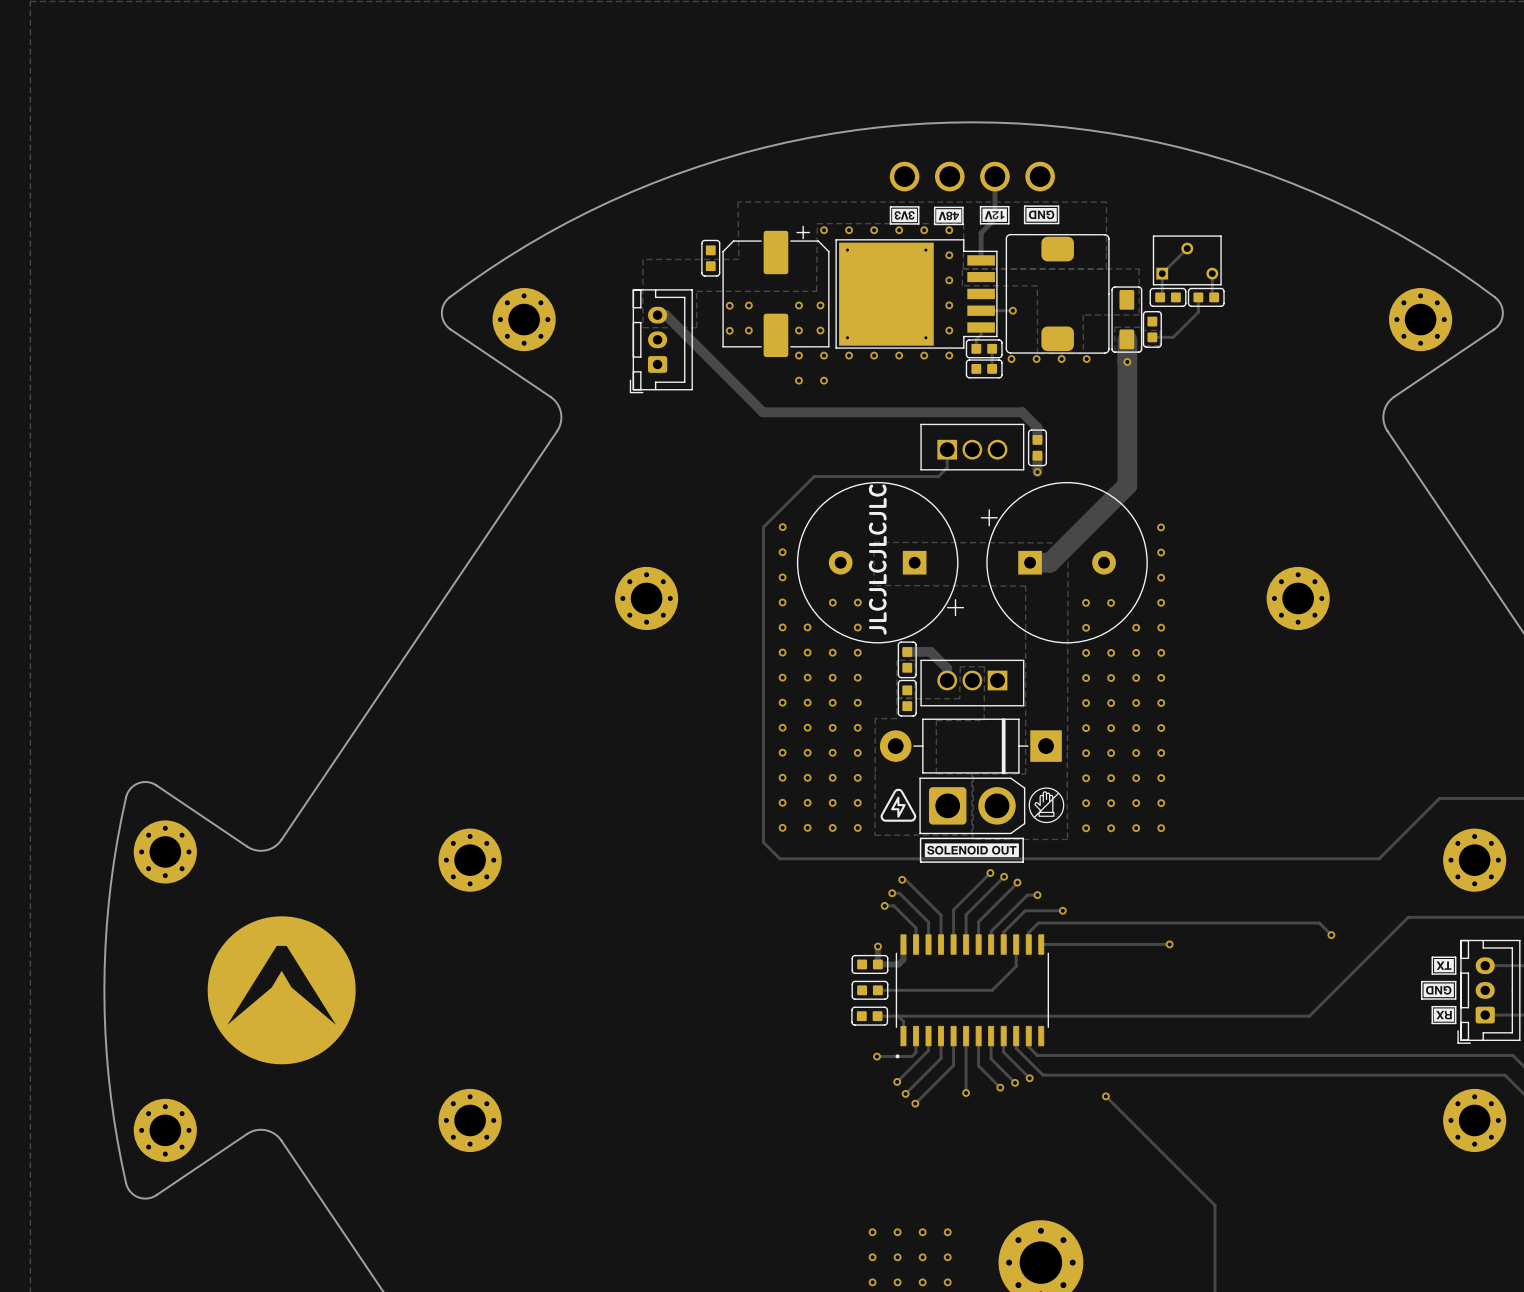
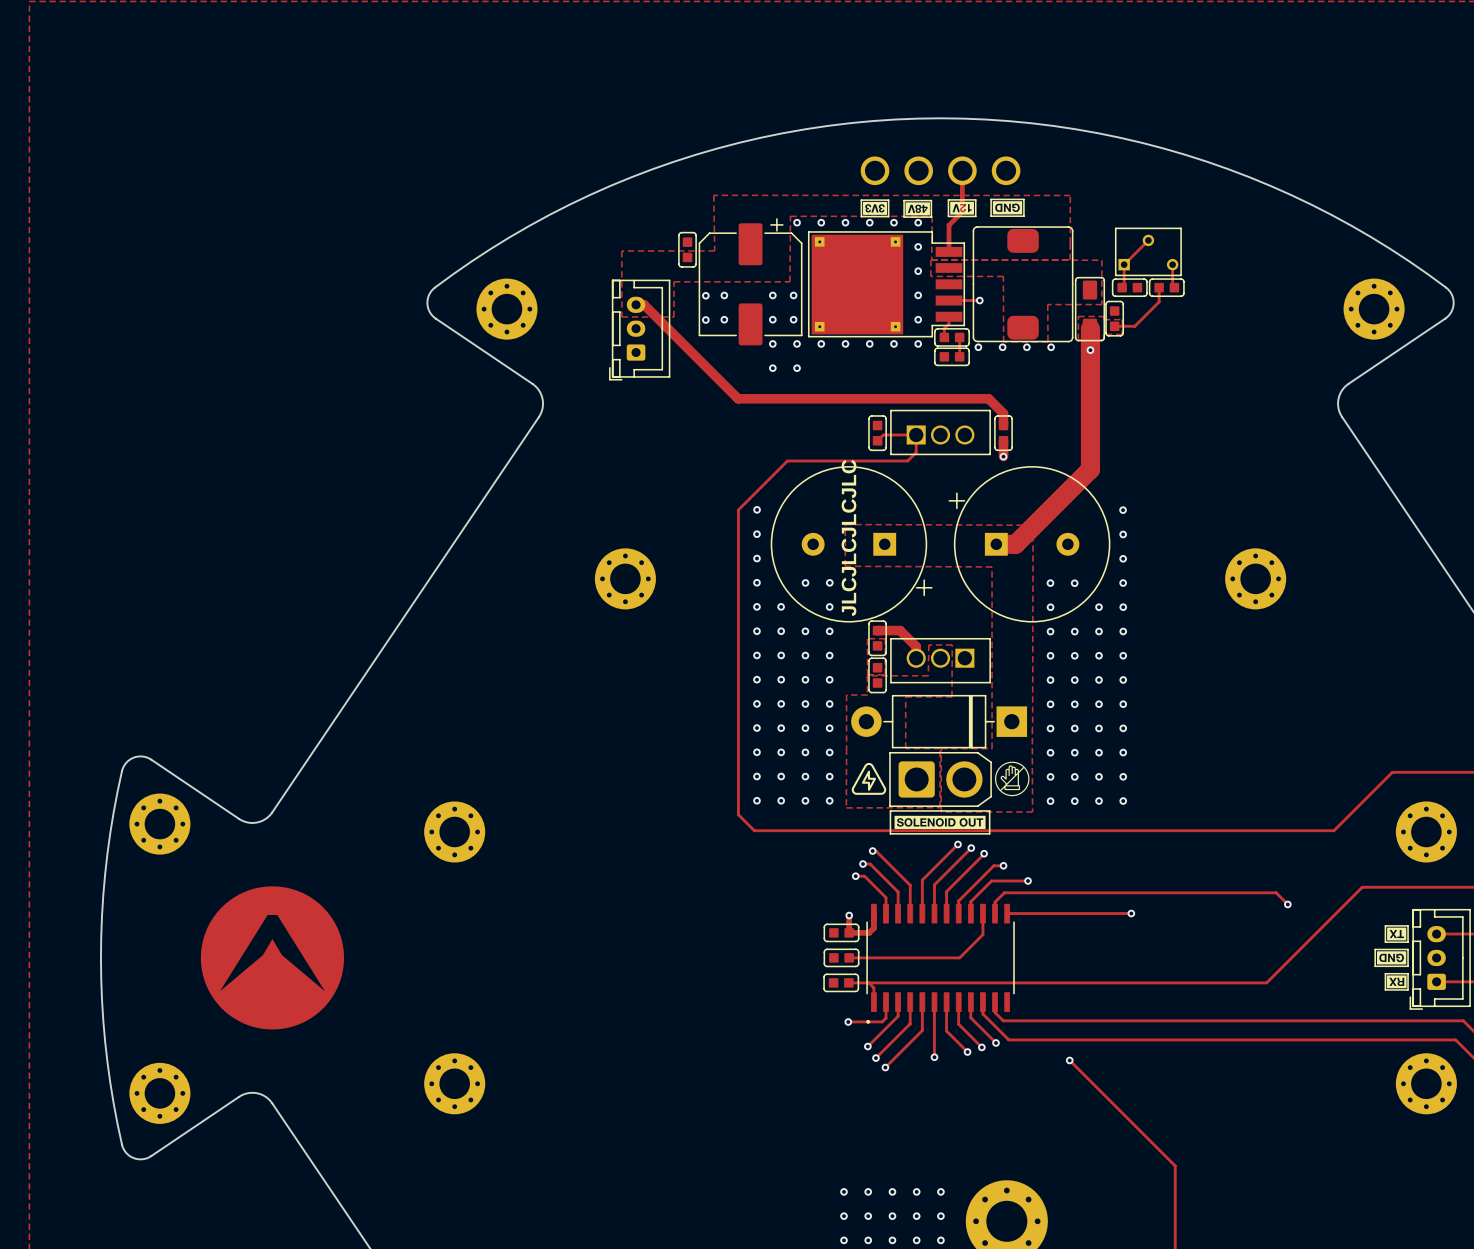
part: none -> (877, 433)
track: none -> (916, 434) (883, 434) (877, 440)
via: none -> (940, 1191)
via: none -> (940, 1216)
via: none -> (940, 1240)

